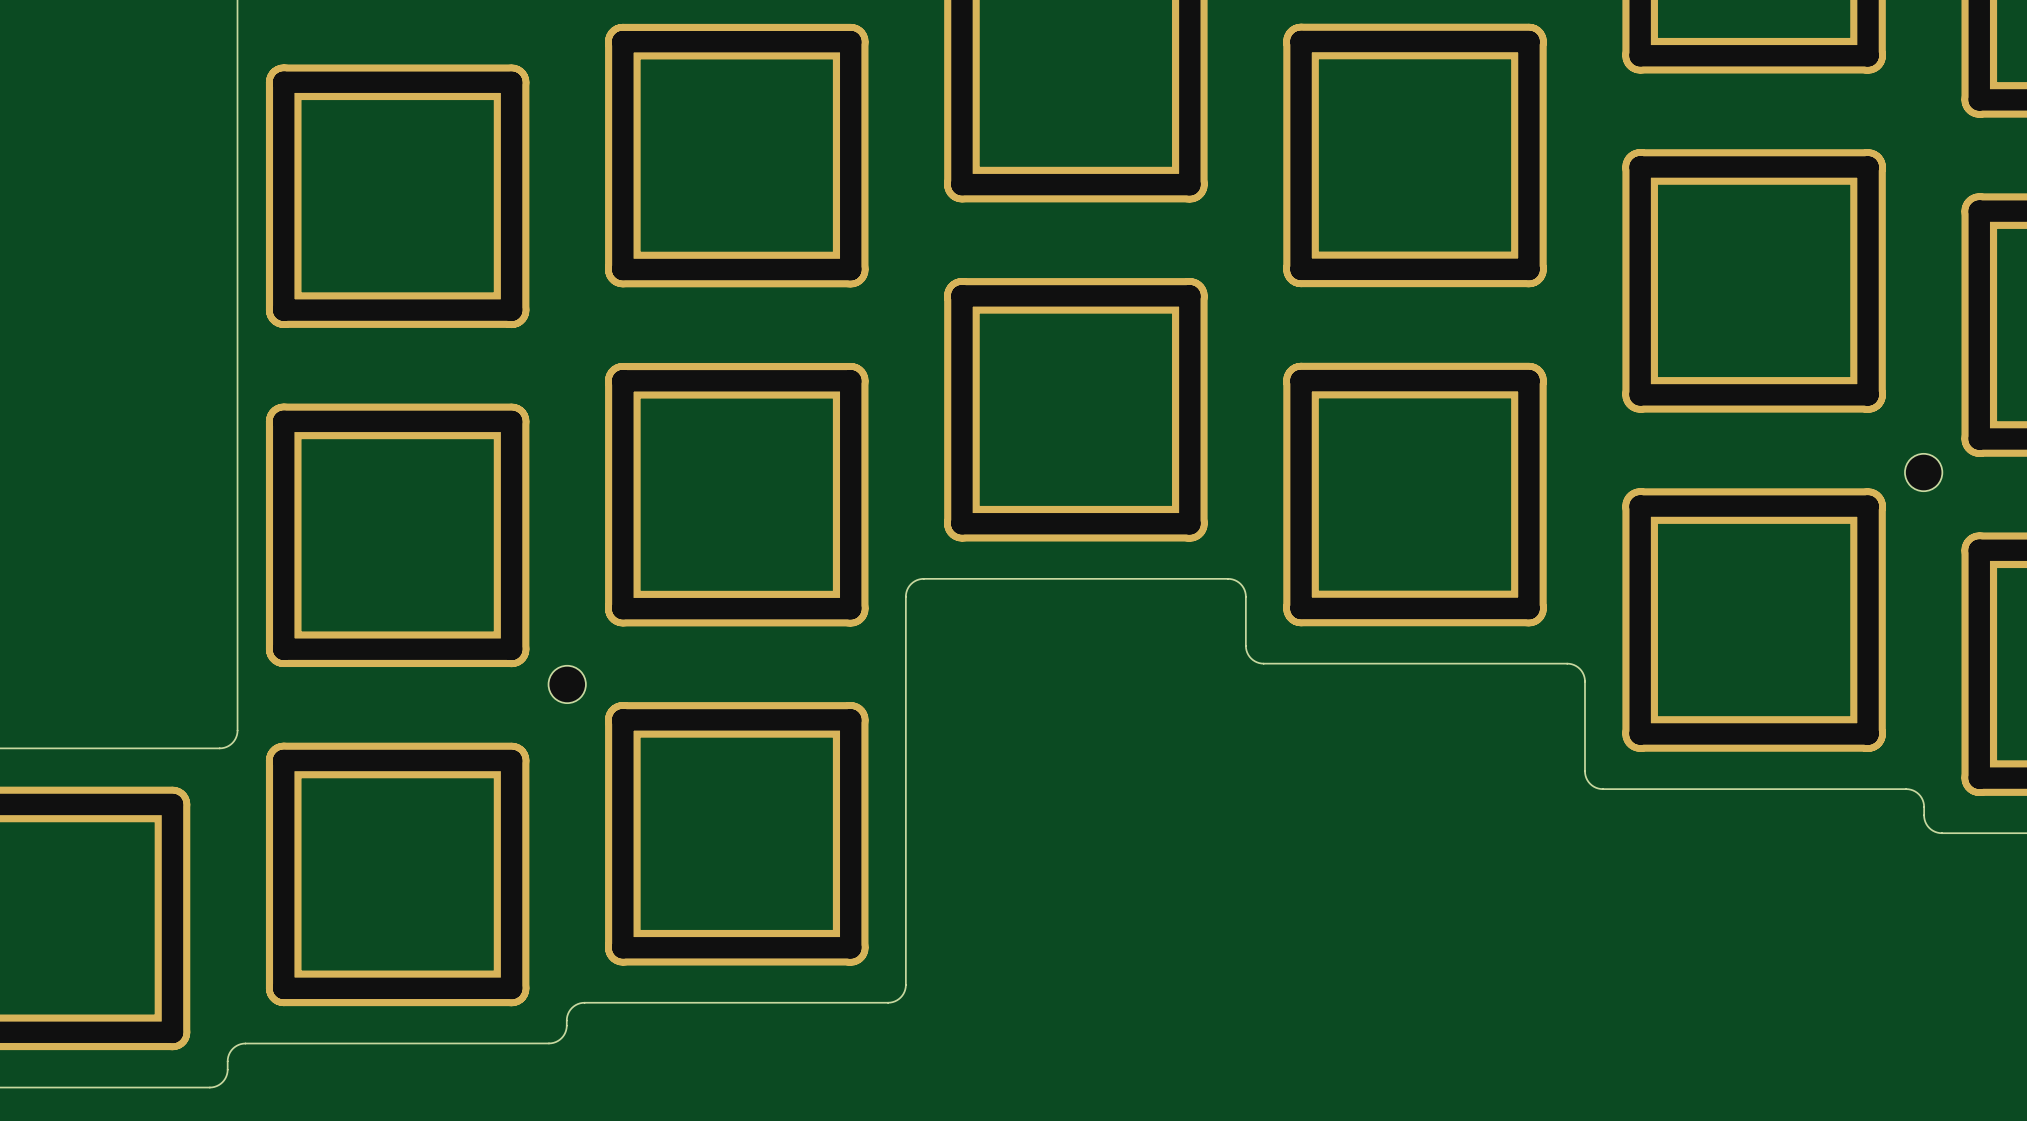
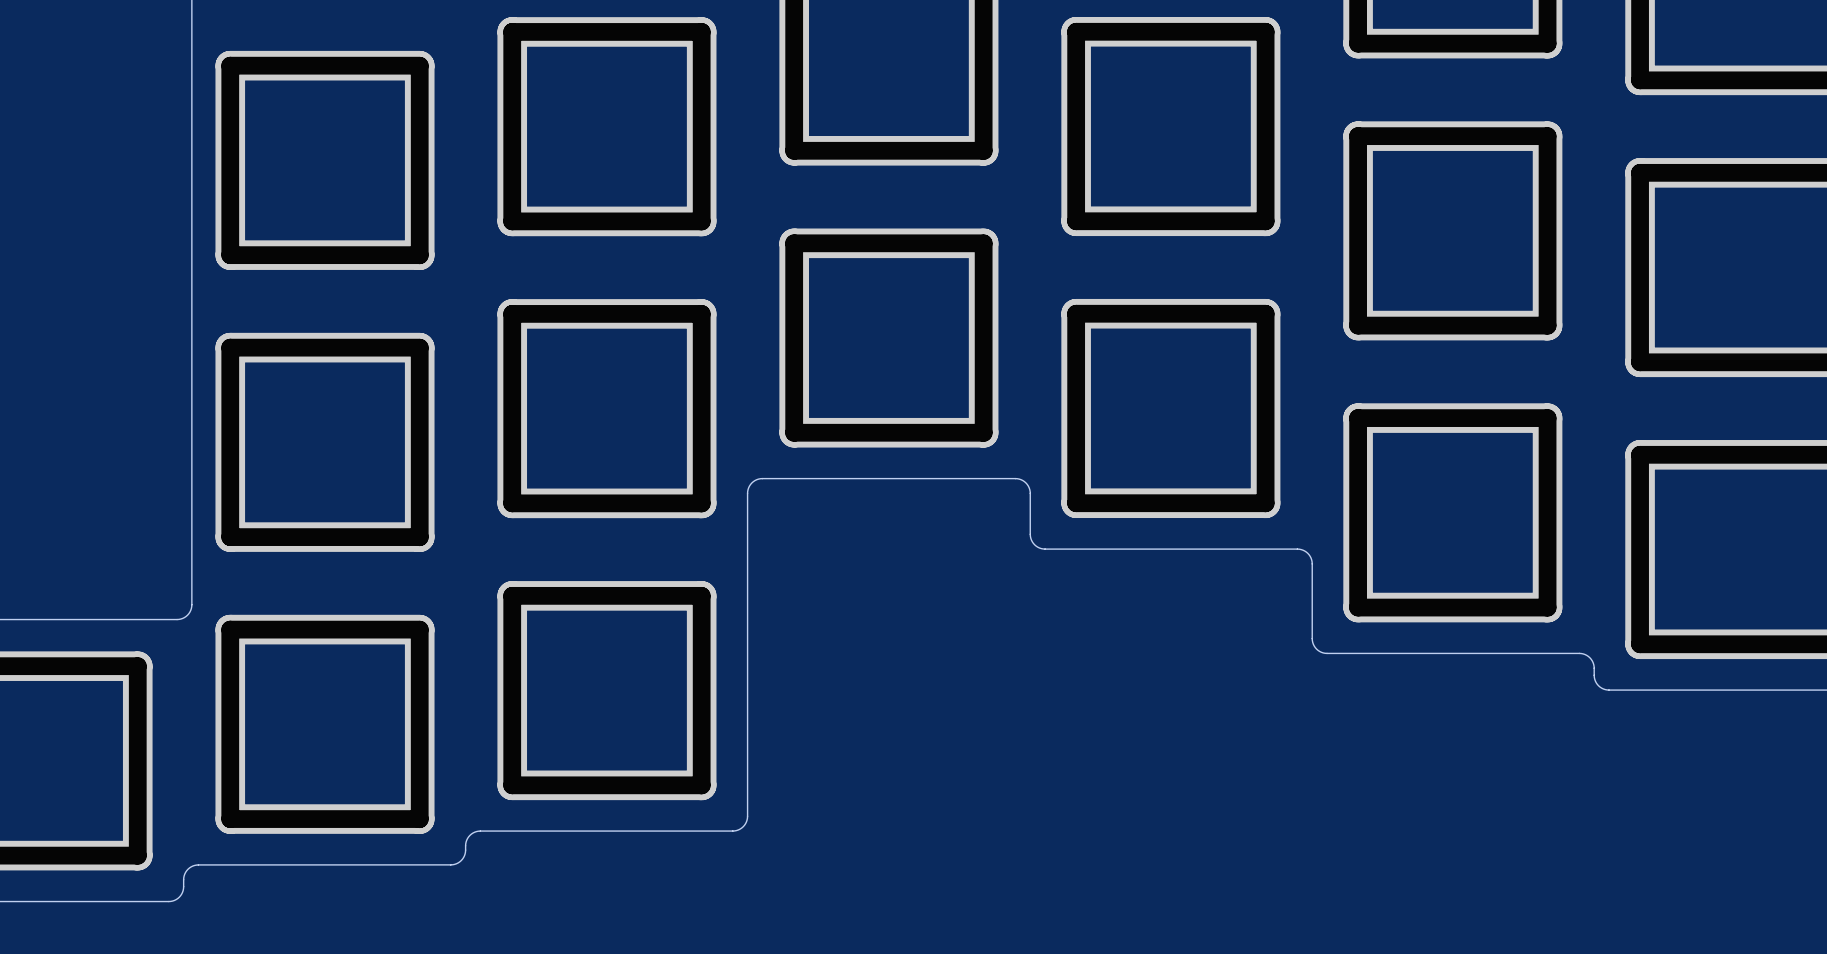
part: (1923, 472) -> none
part: (567, 684) -> none

